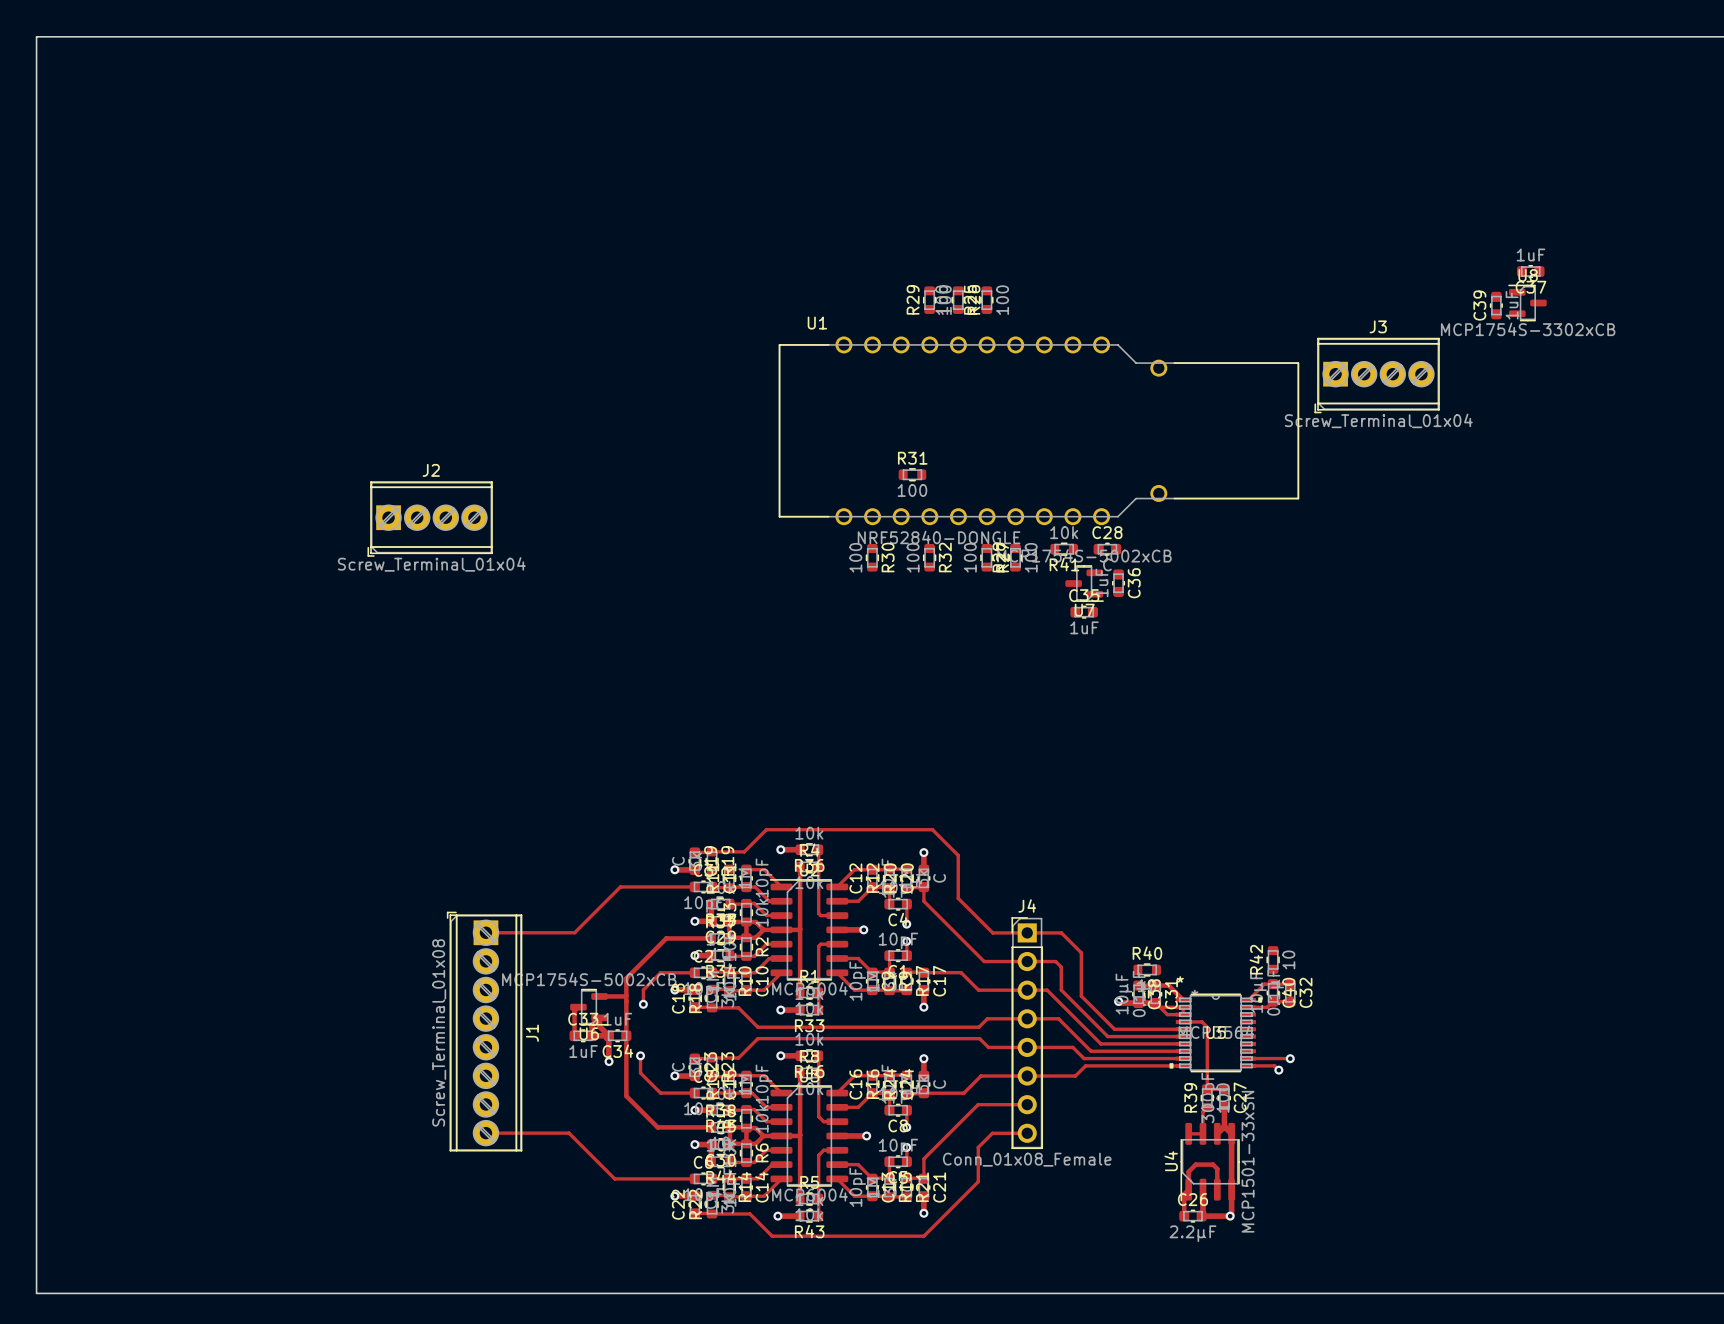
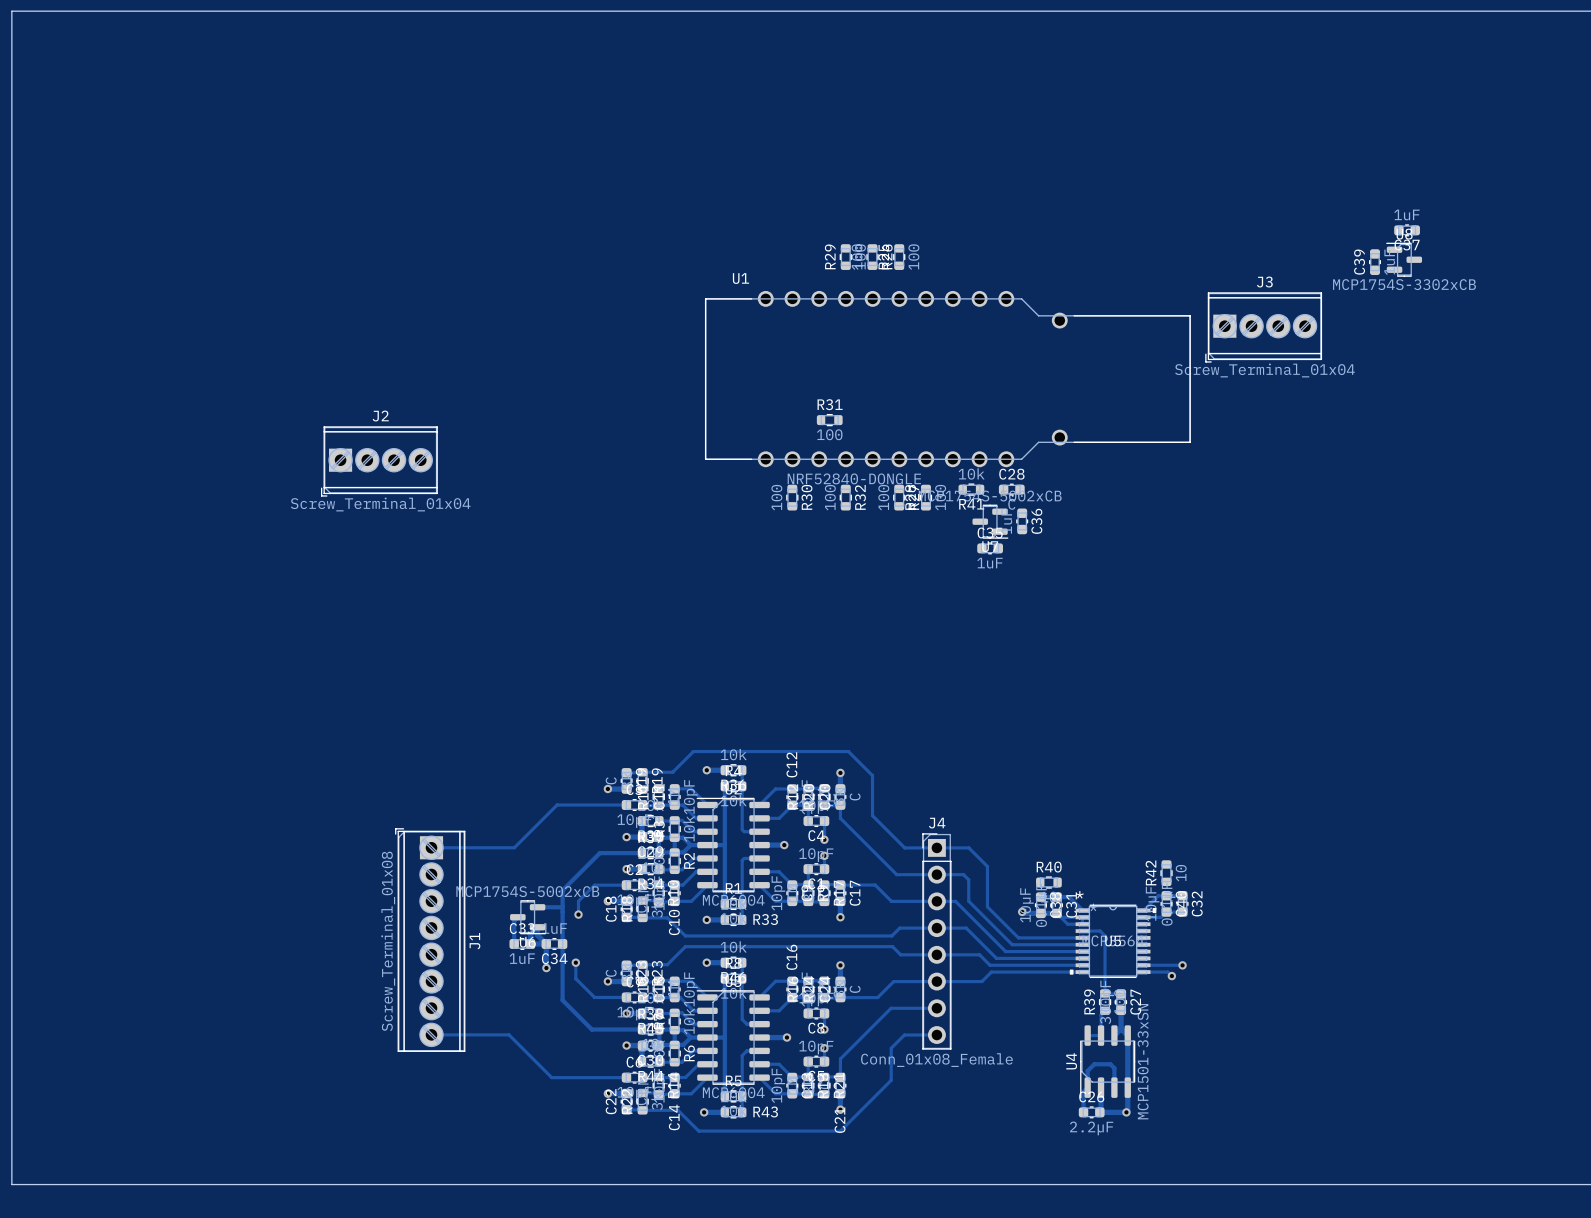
C12 name position: C12 (855, 878) -> C12 (791, 764)
C10 name position: C10 (762, 981) -> C10 (674, 922)
R33 name position: R33 (809, 1025) -> R33 (765, 919)
C16 name position: C16 (855, 1084) -> C16 (791, 957)
C14 name position: C14 (761, 1187) -> C14 (674, 1117)
C21 name position: C21 (939, 1187) -> C21 (840, 1120)
R43 name position: R43 (809, 1231) -> R43 (765, 1111)

